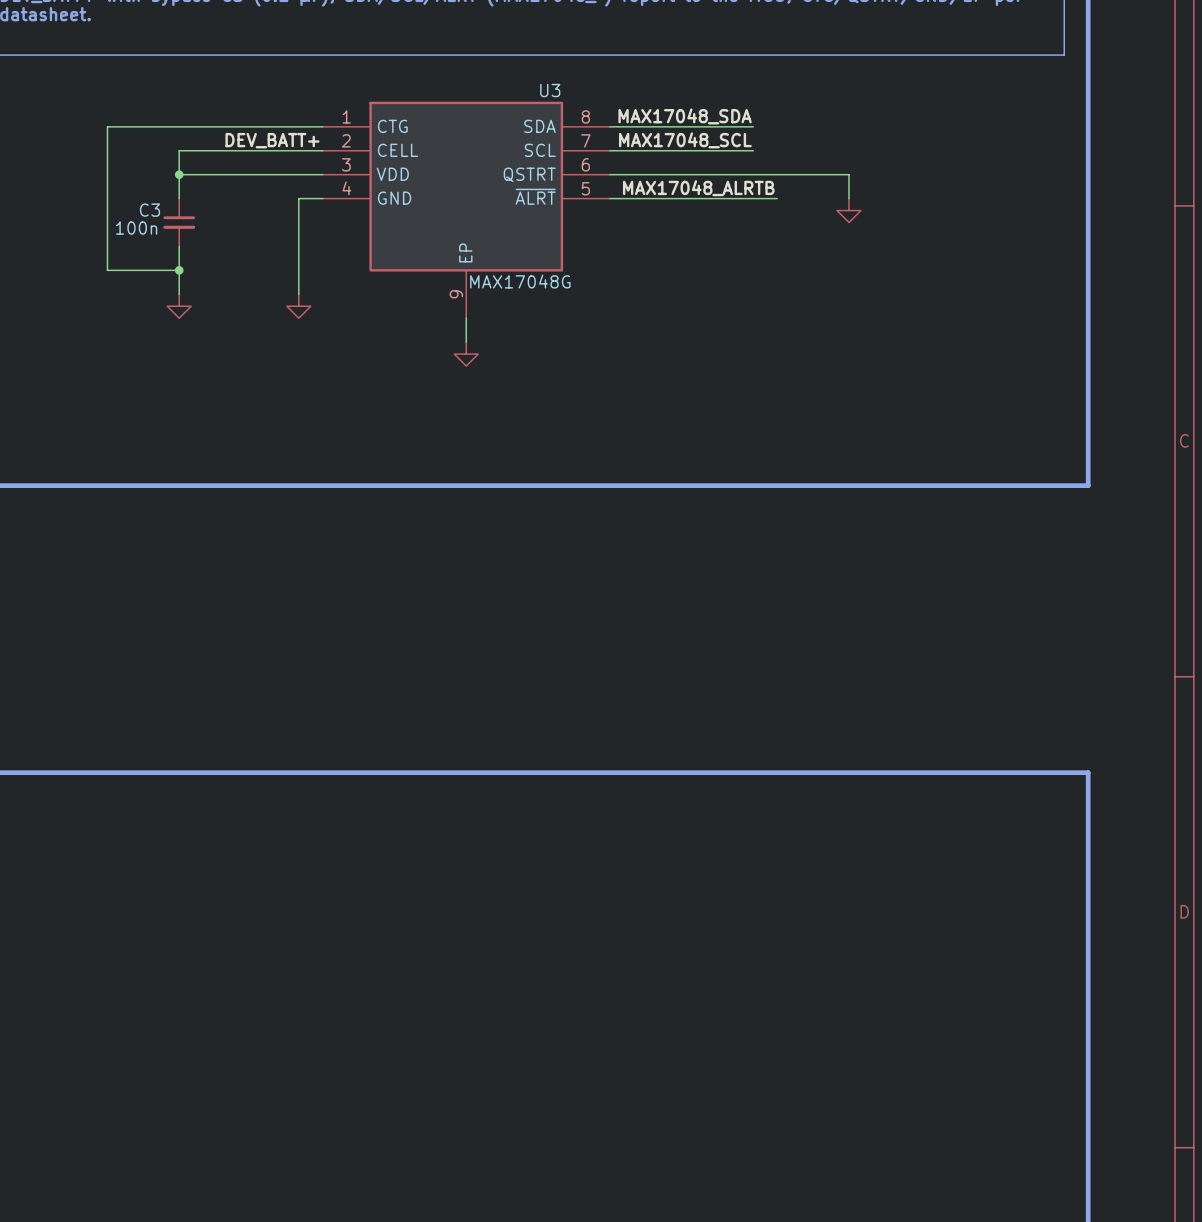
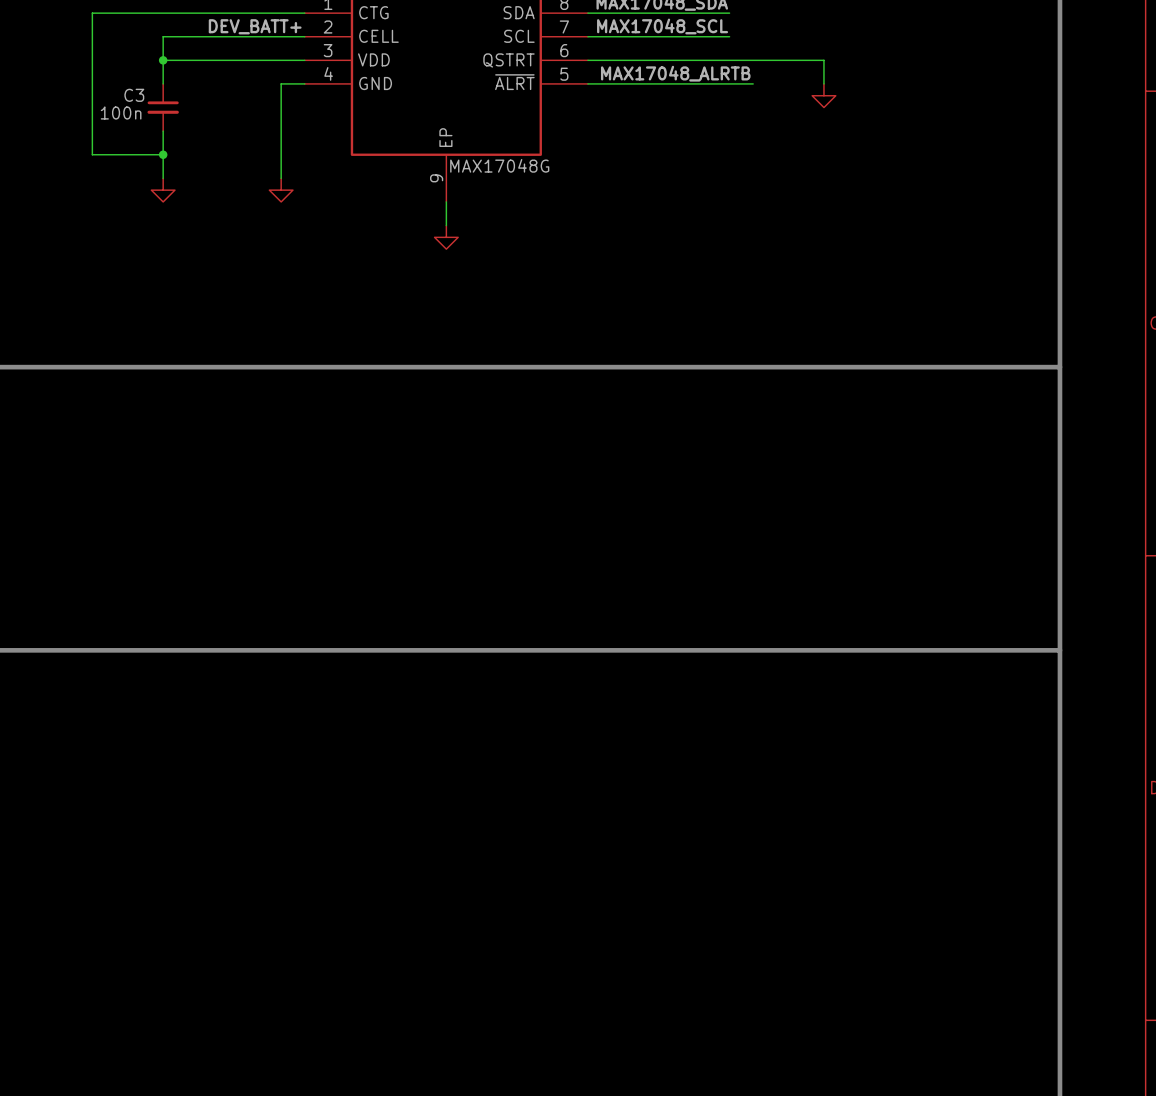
line: none -> (1059, 367) (1059, 650)

